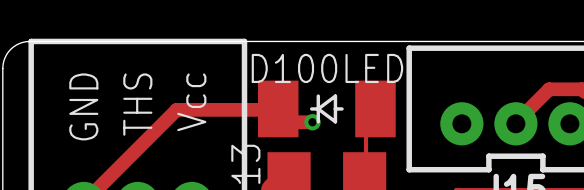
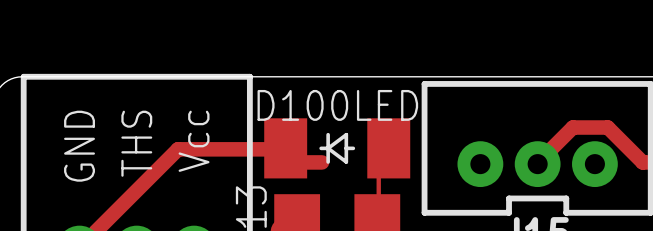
via: (312, 122) -> none

